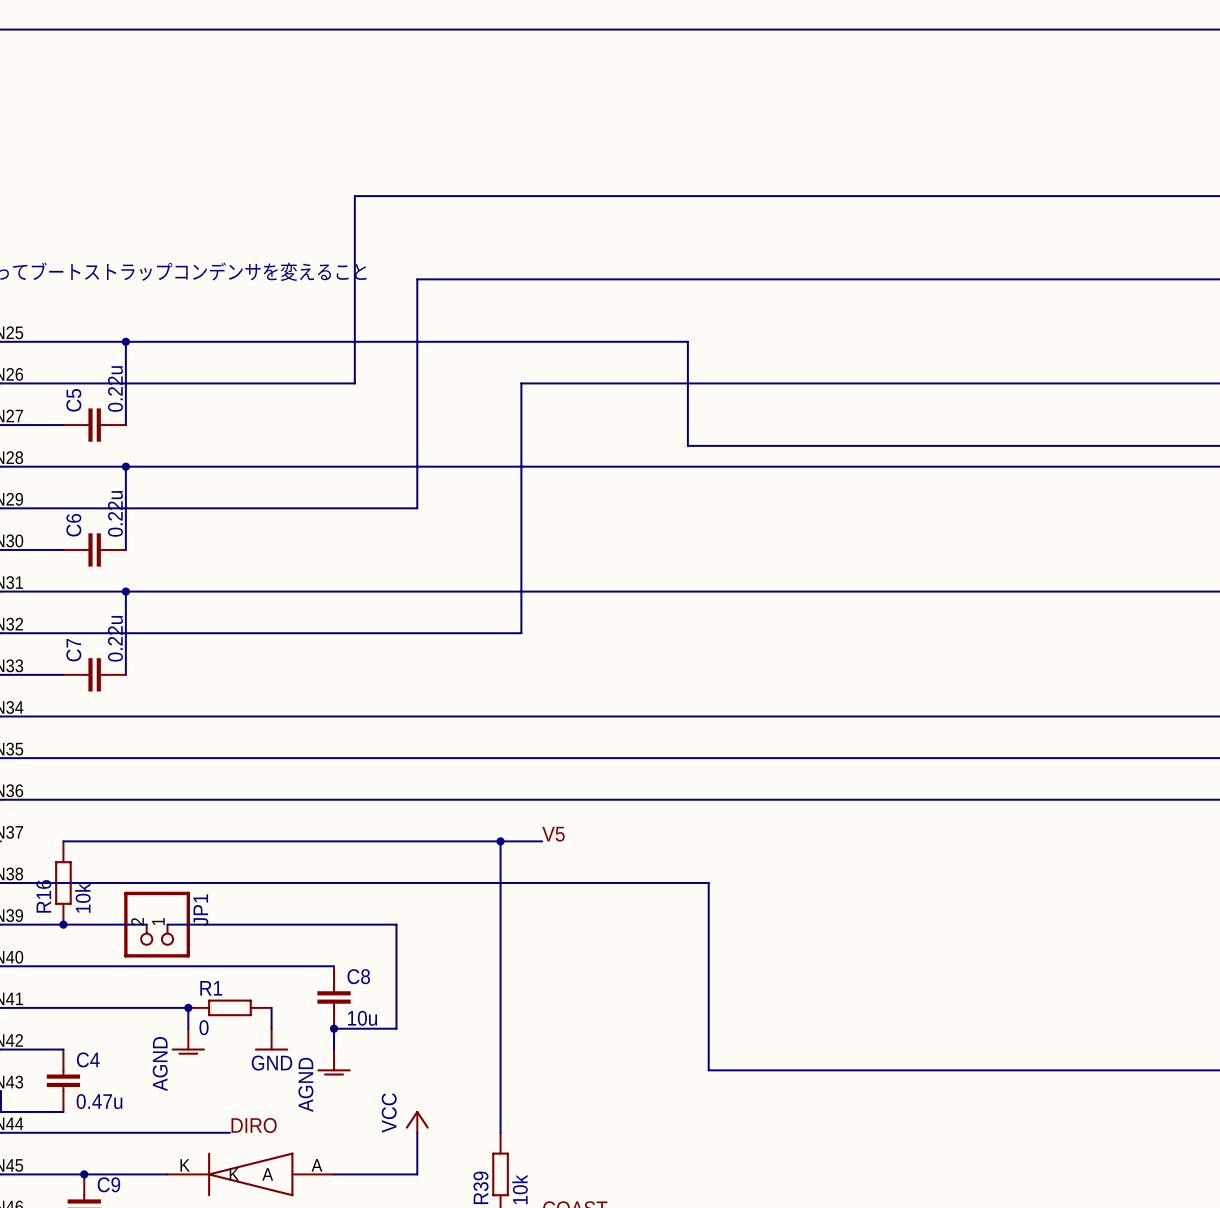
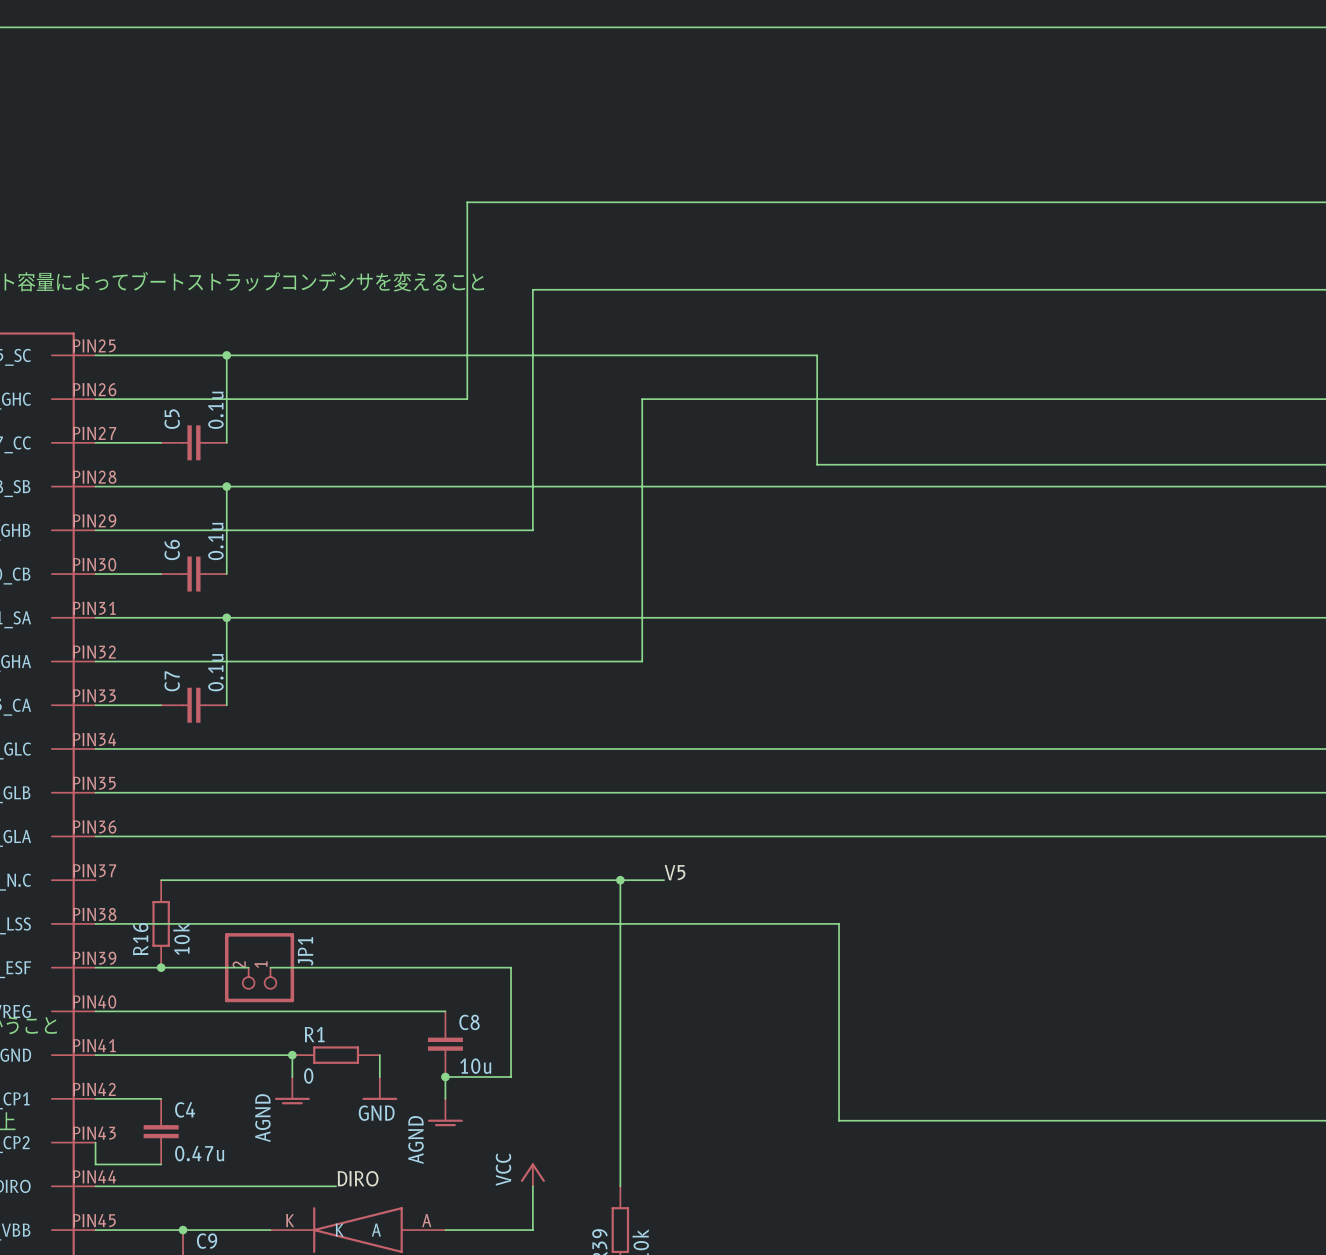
C5 value: 0.22u (115, 388) -> 0.1u (215, 410)
C6 value: 0.22u (115, 513) -> 0.1u (215, 541)
C7 value: 0.22u (115, 638) -> 0.1u (215, 672)

